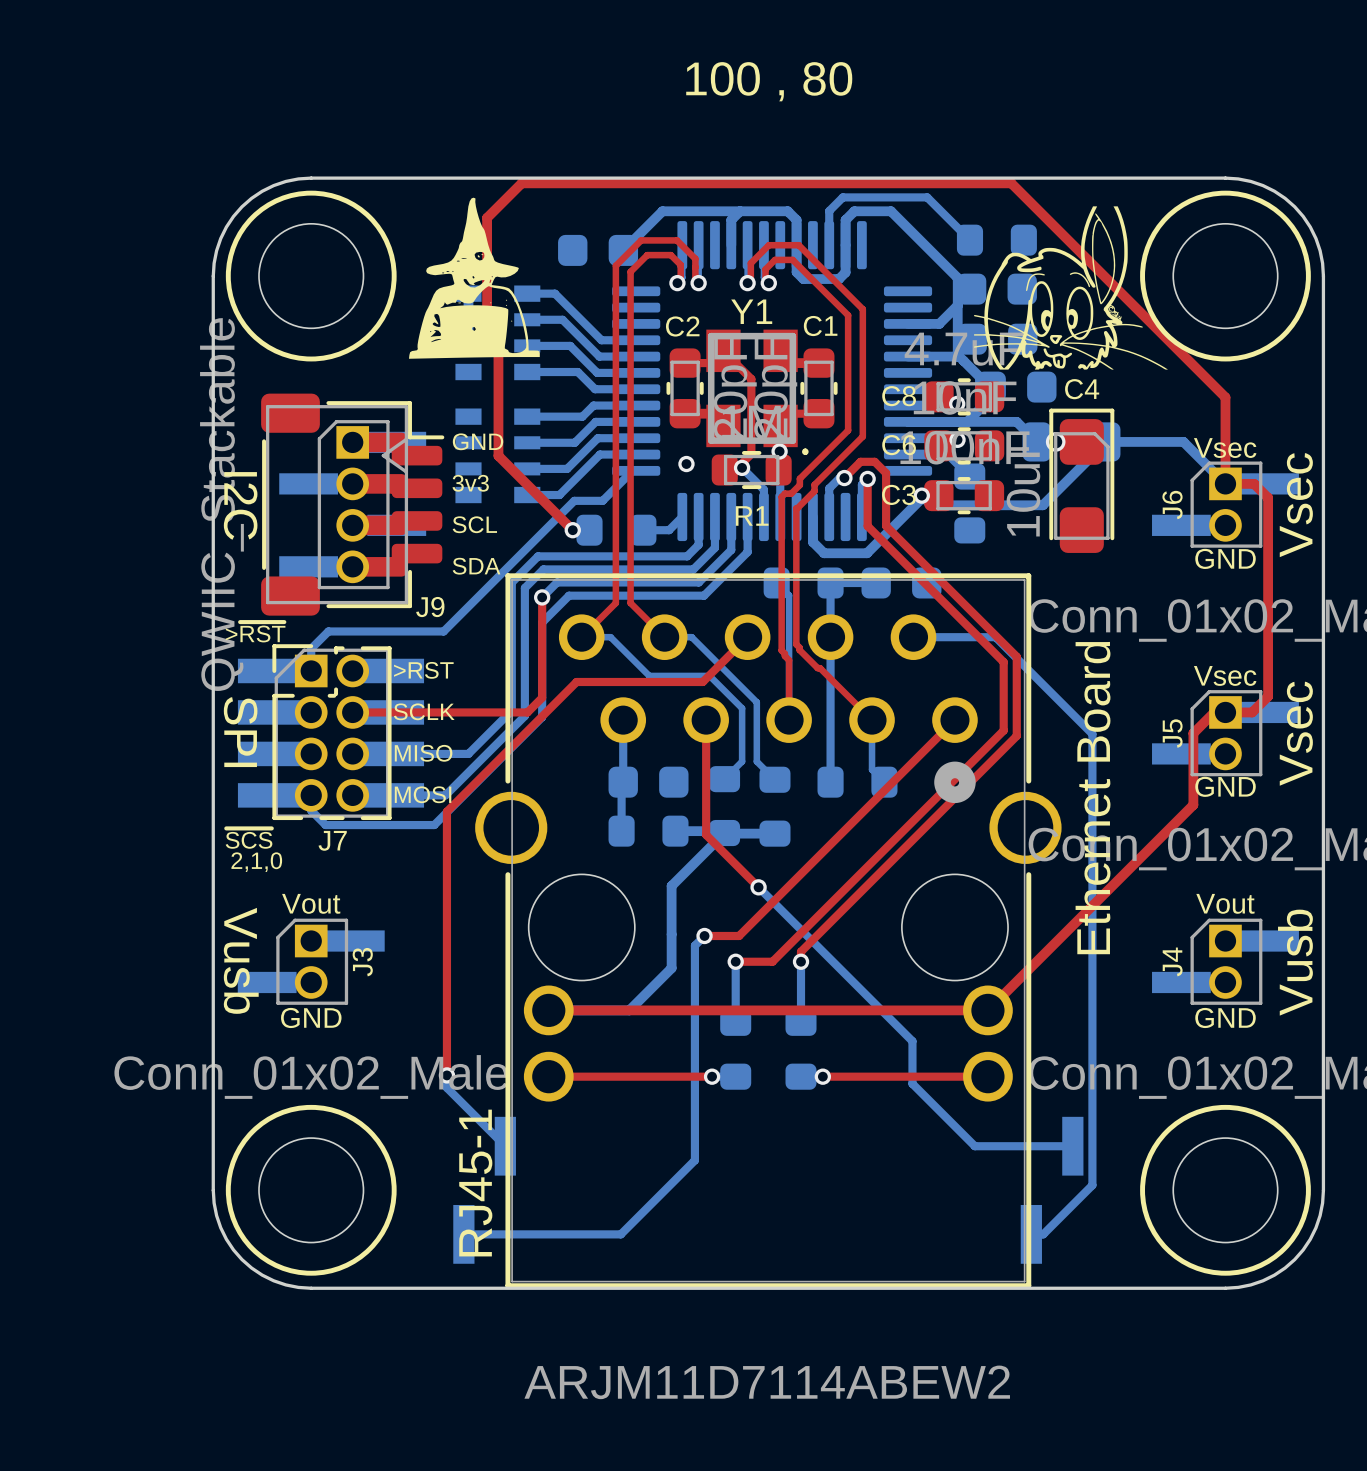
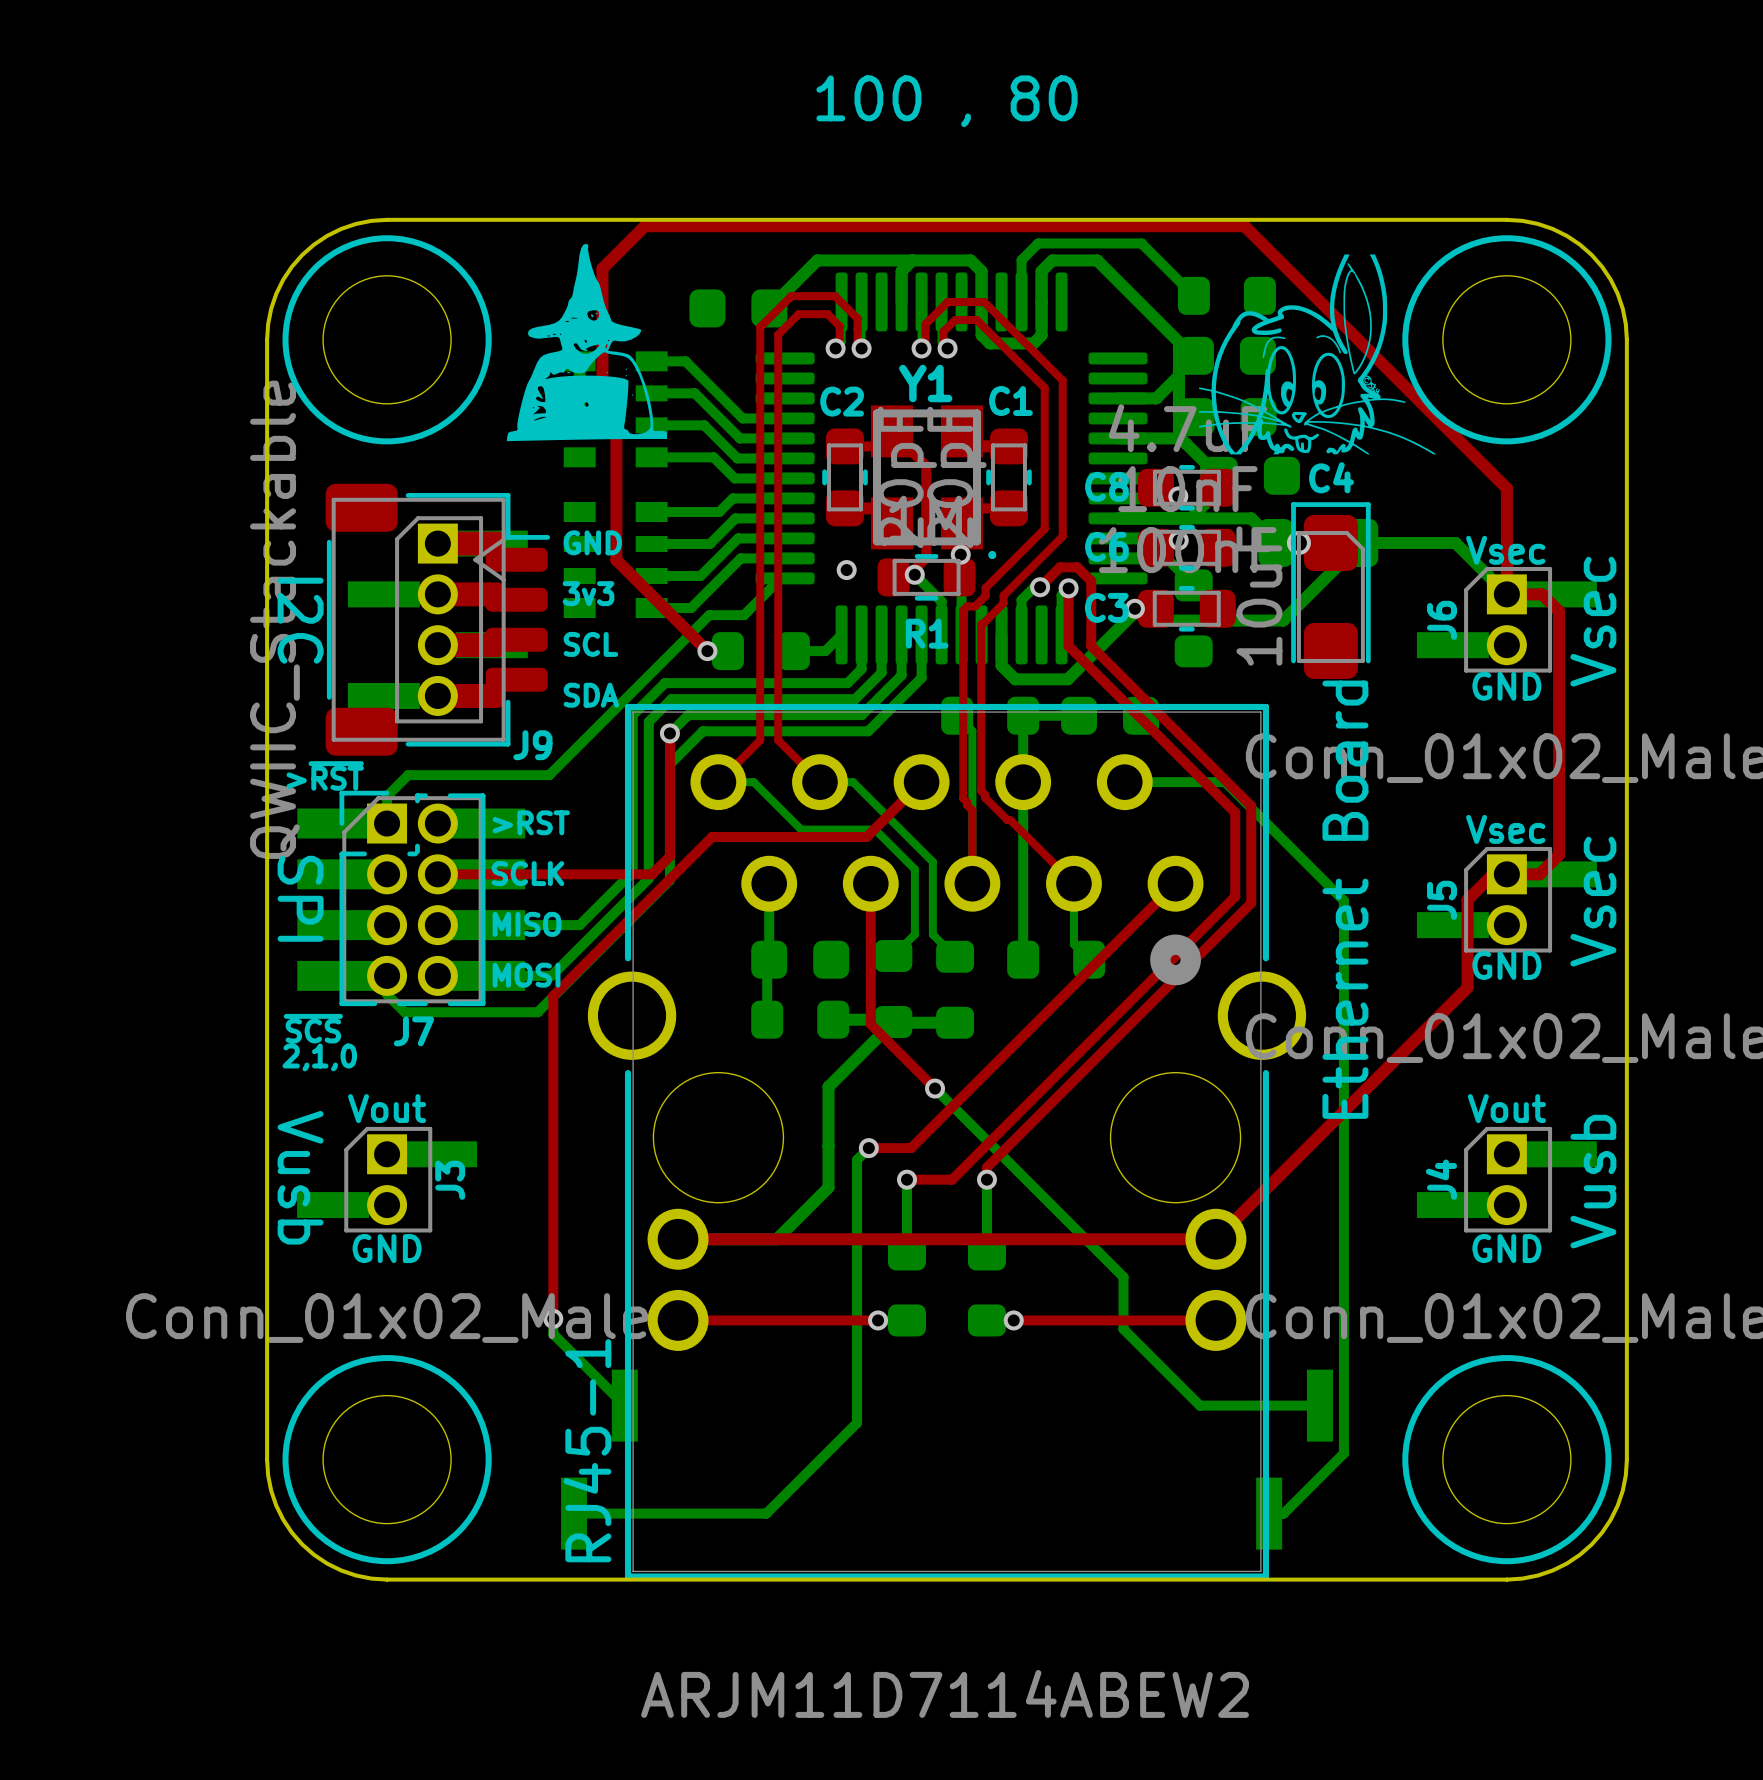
text position: Ethernet Board (1093, 798) -> Ethernet Board (1345, 899)

